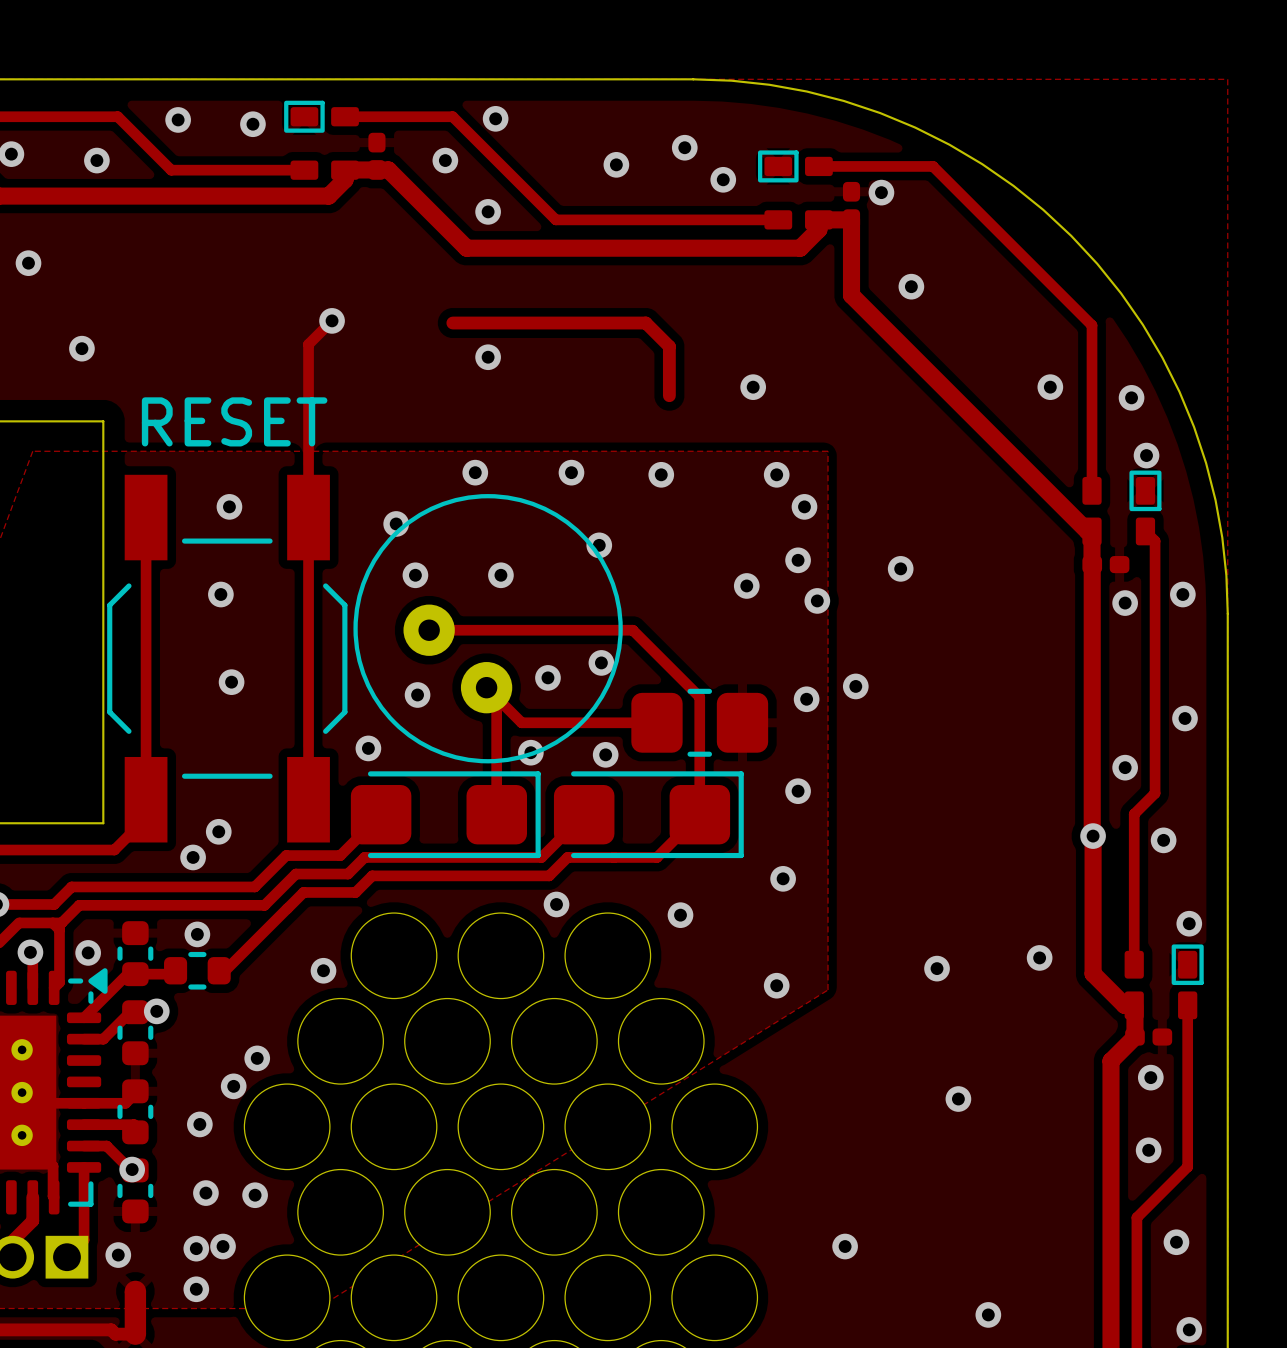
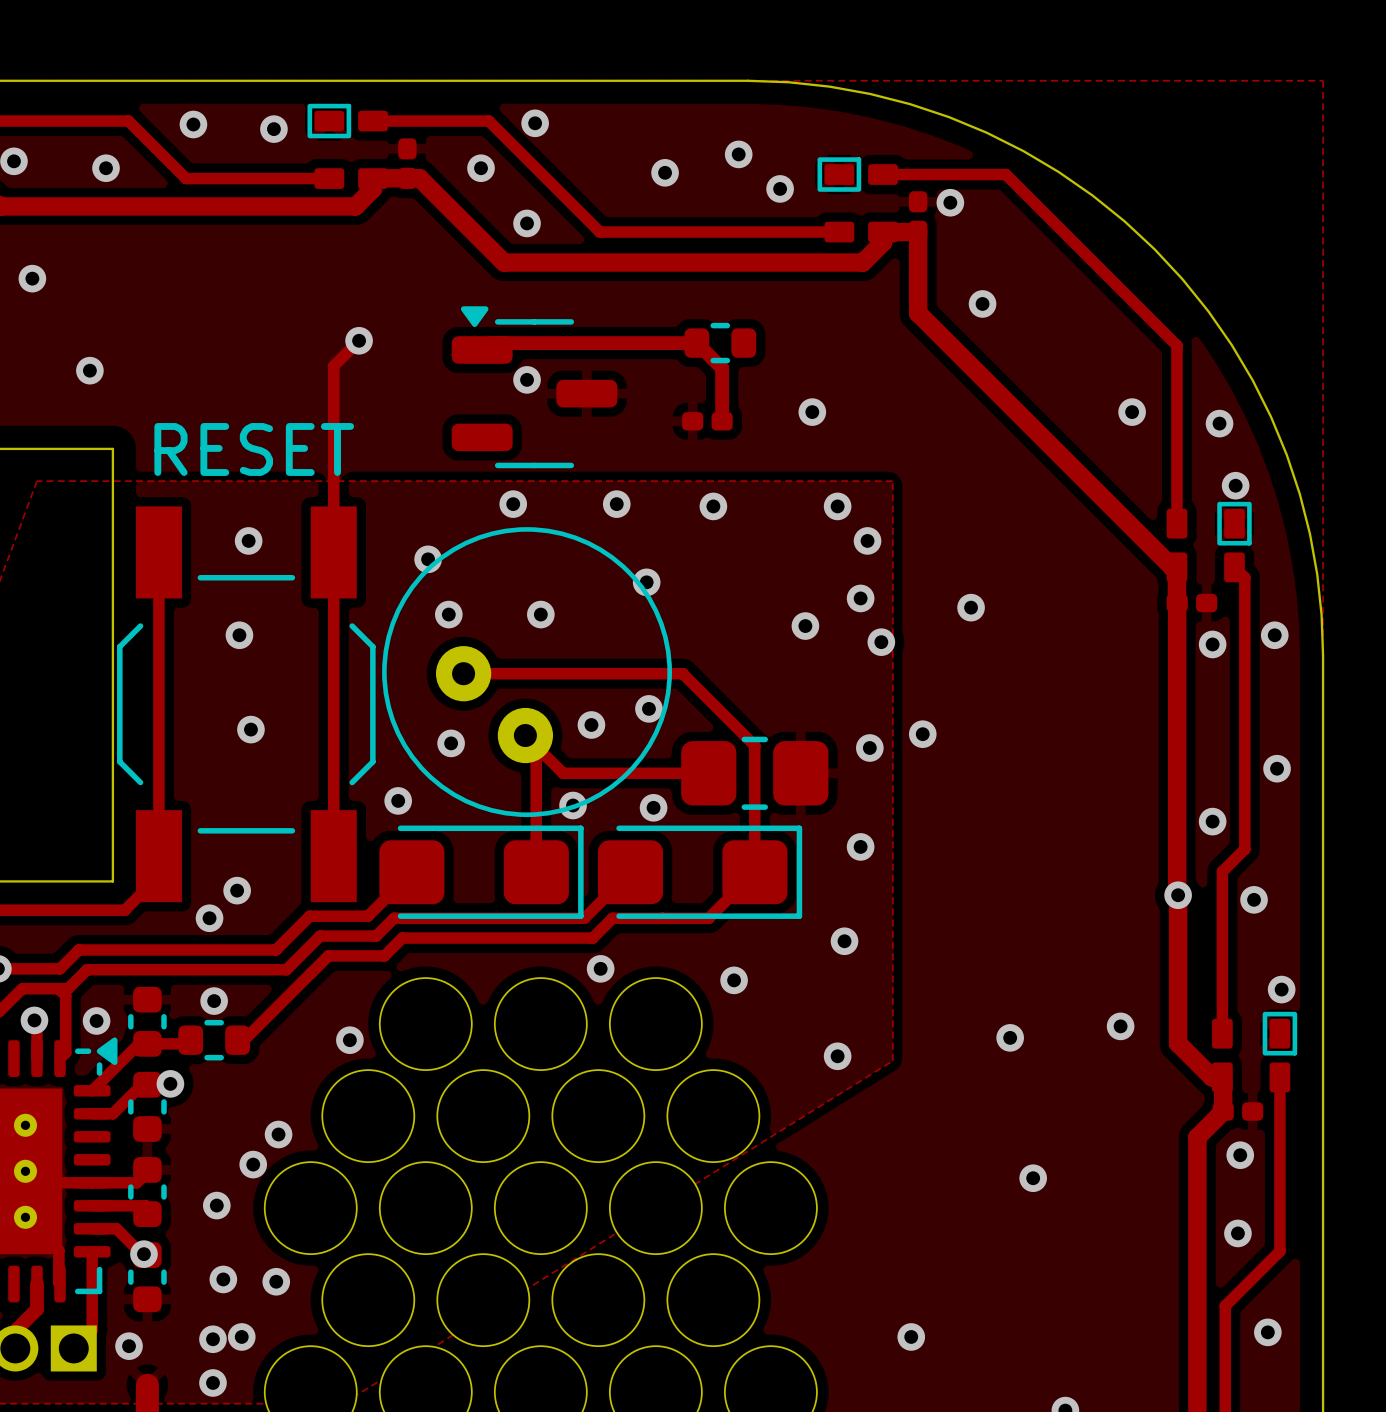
part: none -> (720, 343)
part: none -> (534, 387)
part: none -> (707, 421)

